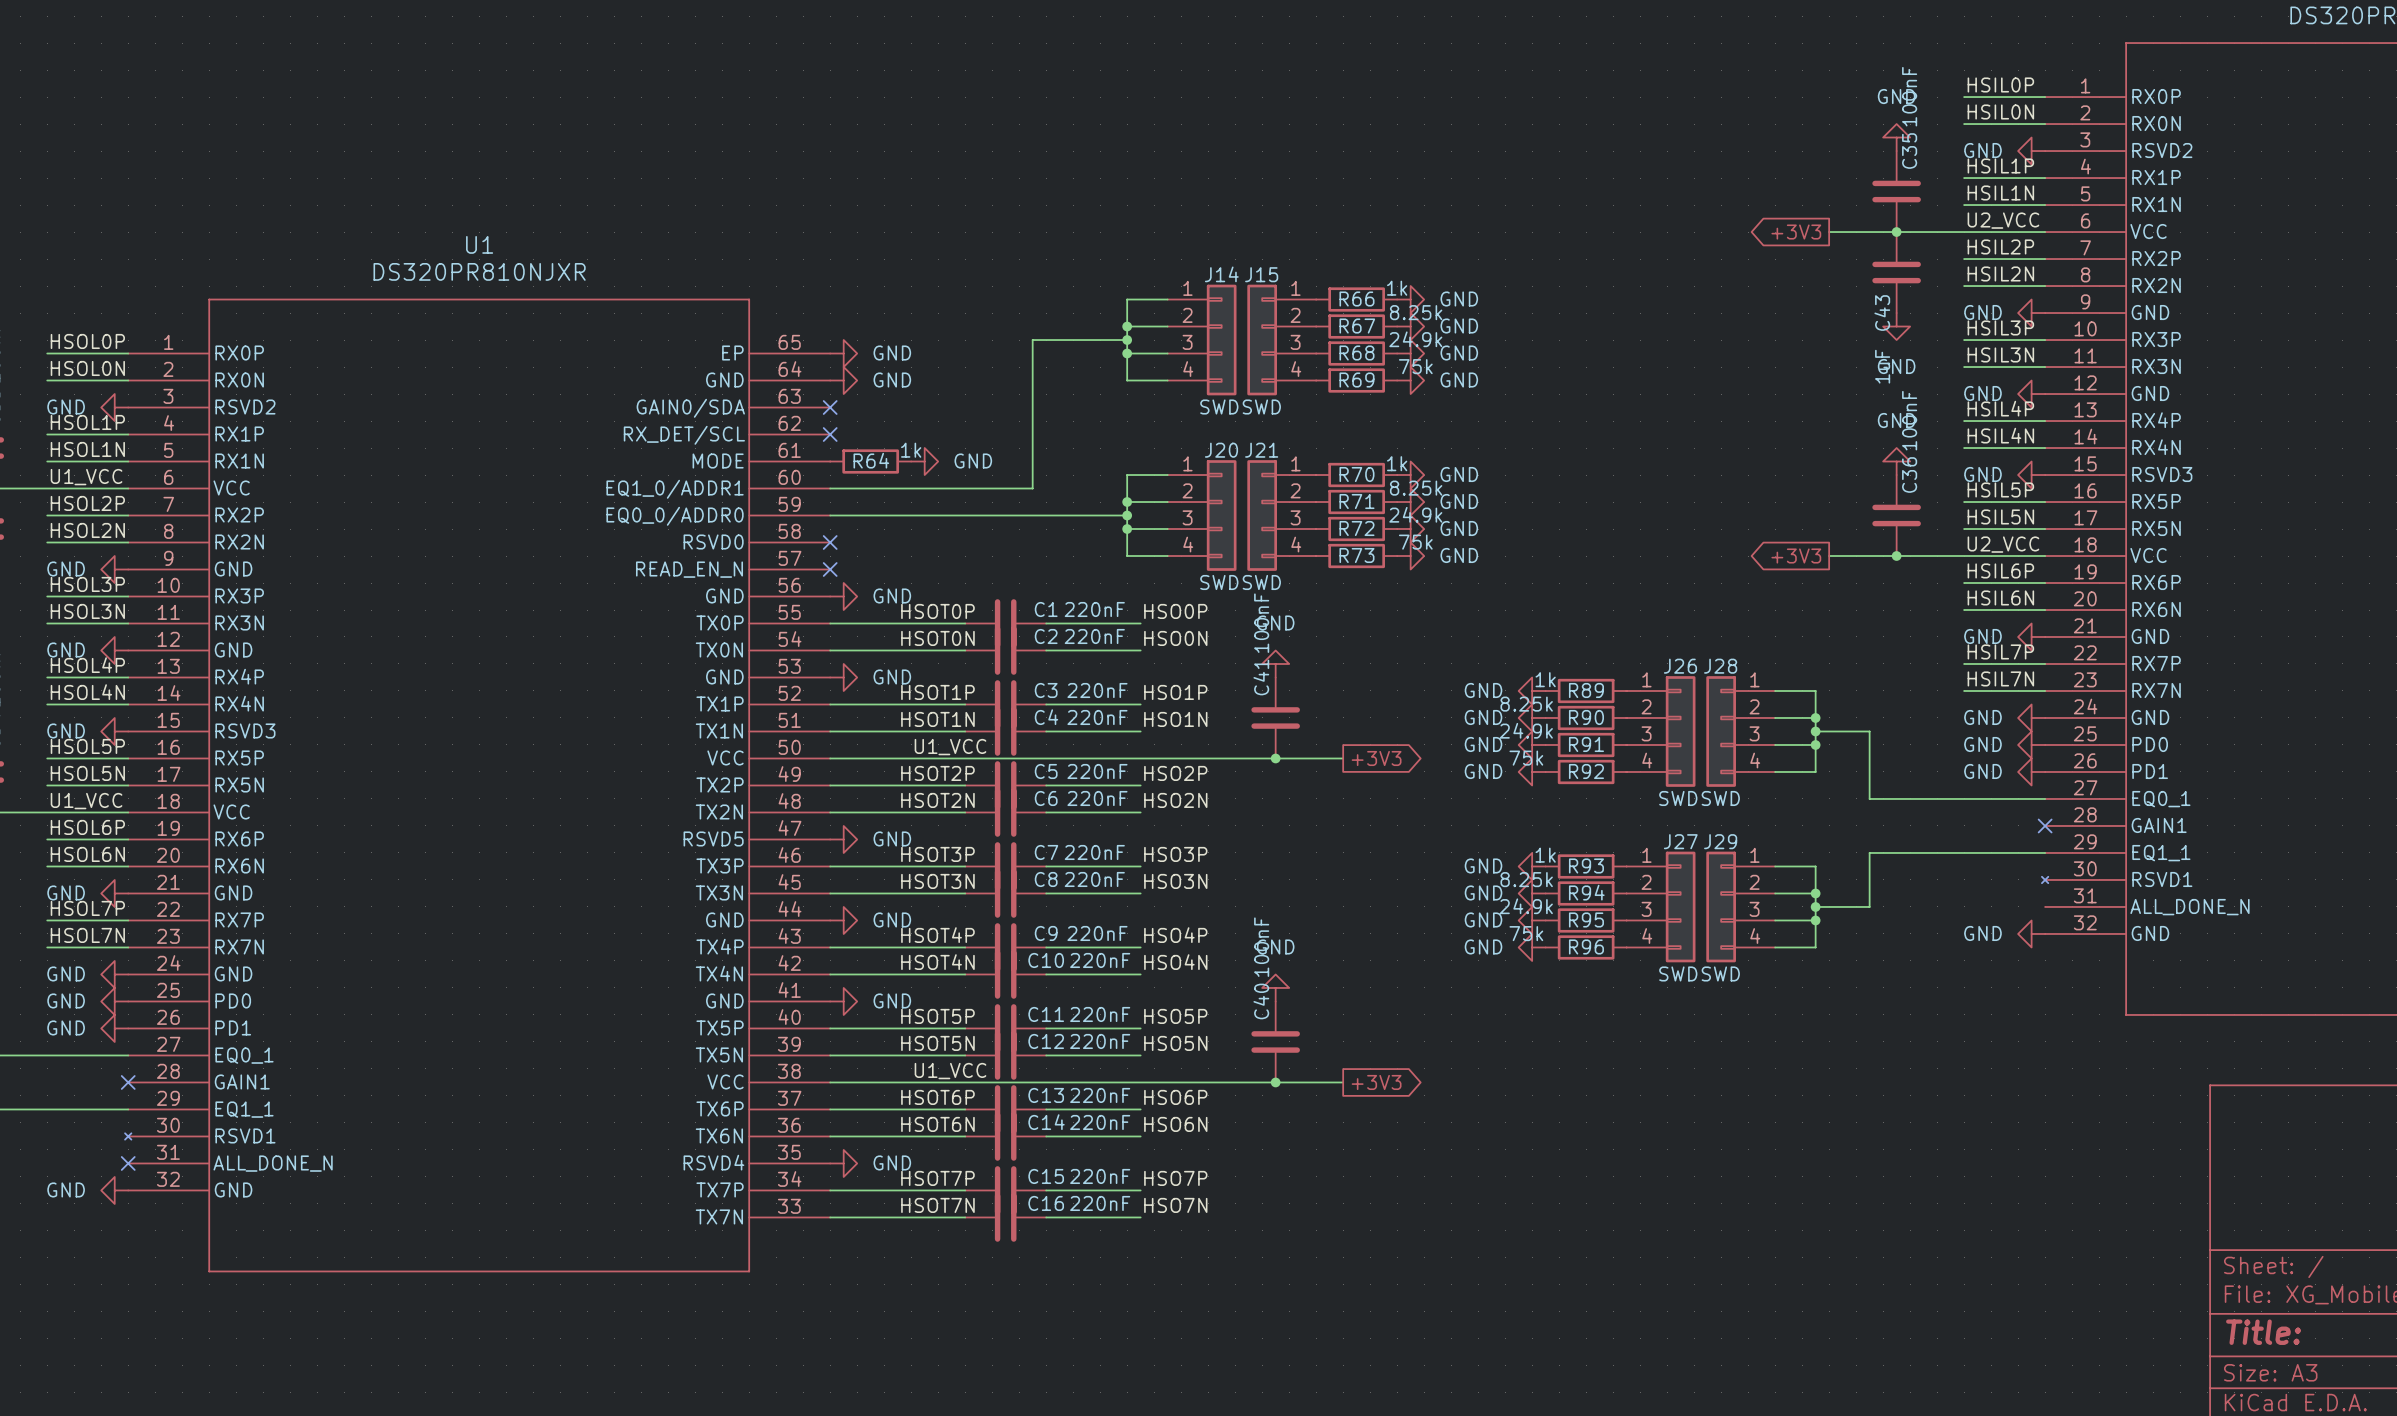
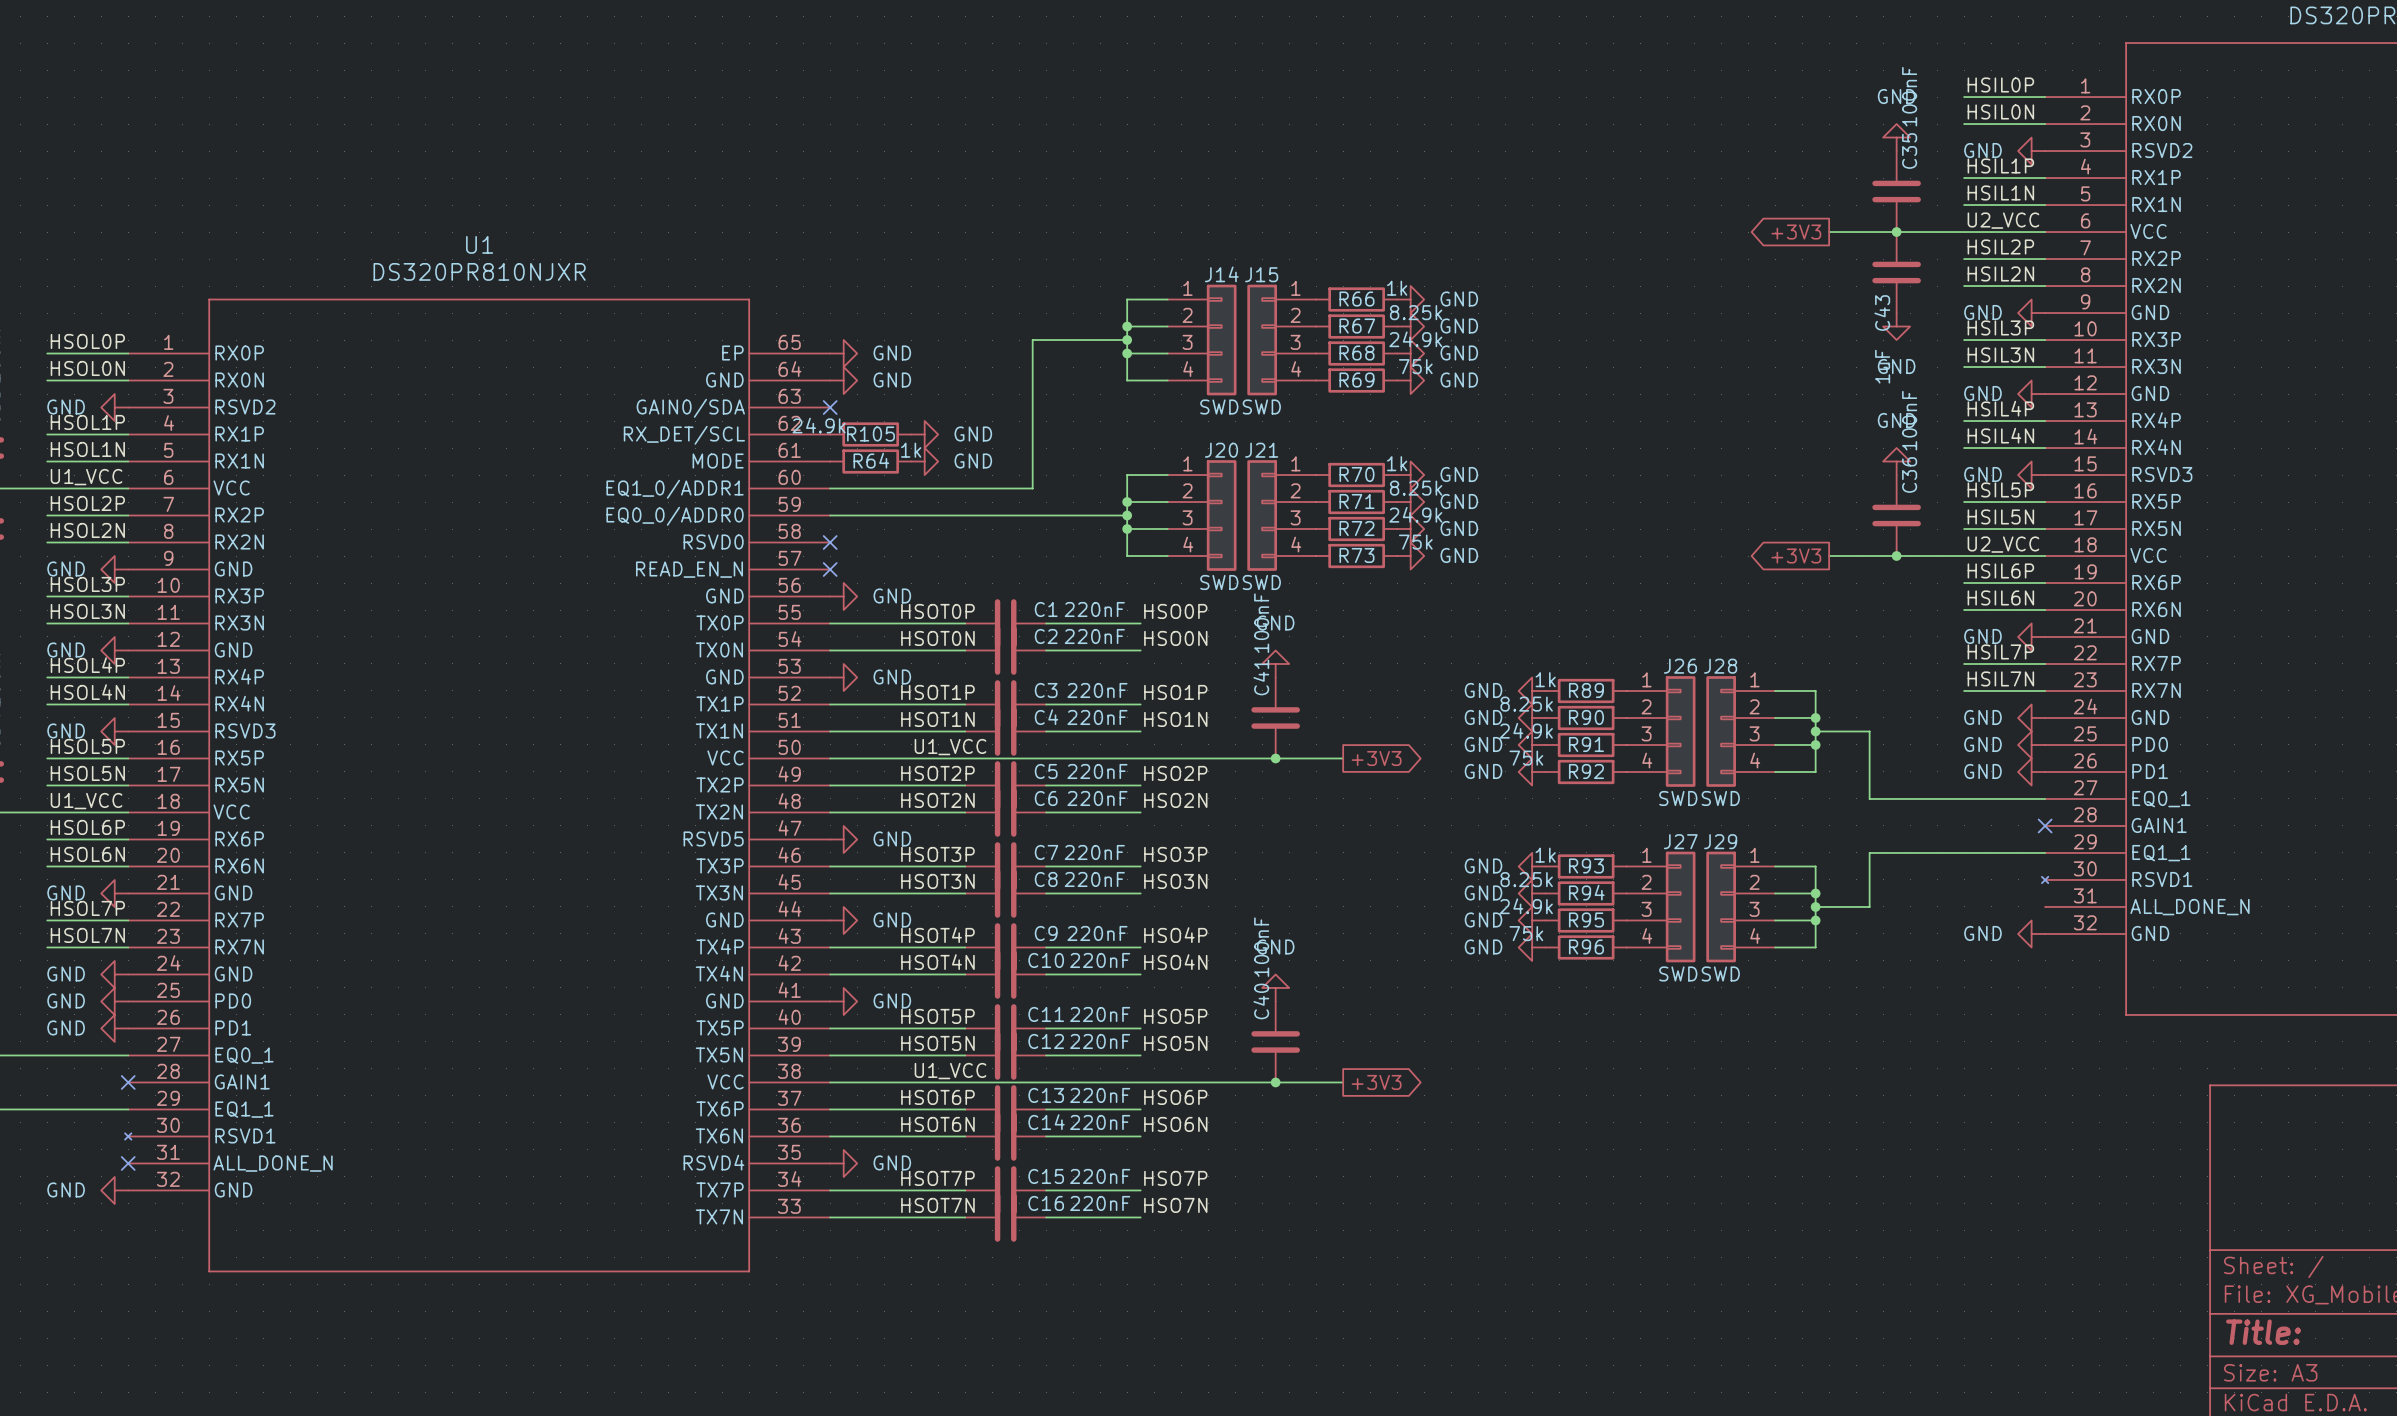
no-connect mark: (830, 434) -> none
R105: none -> 24.9k (870, 434)
power symbol: none -> GND (924, 434)

